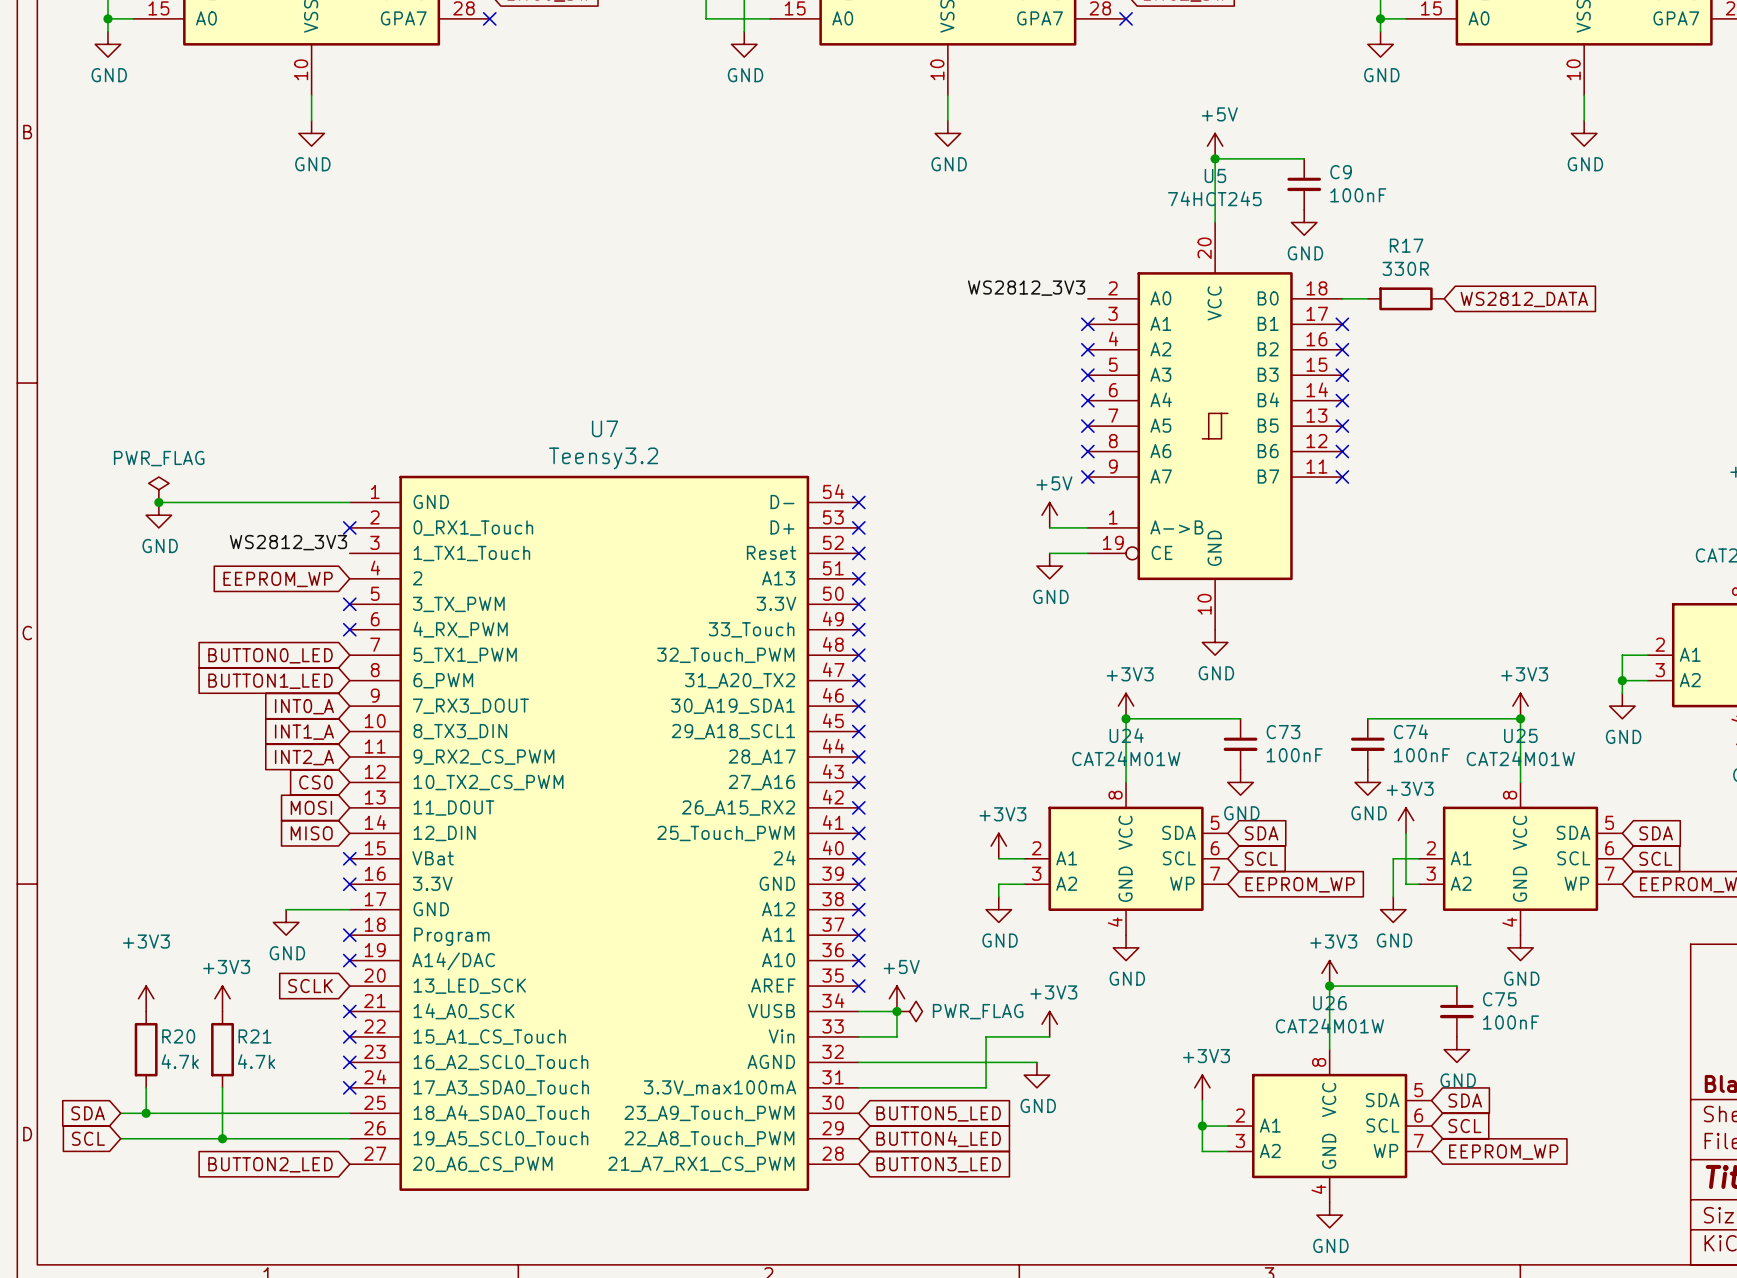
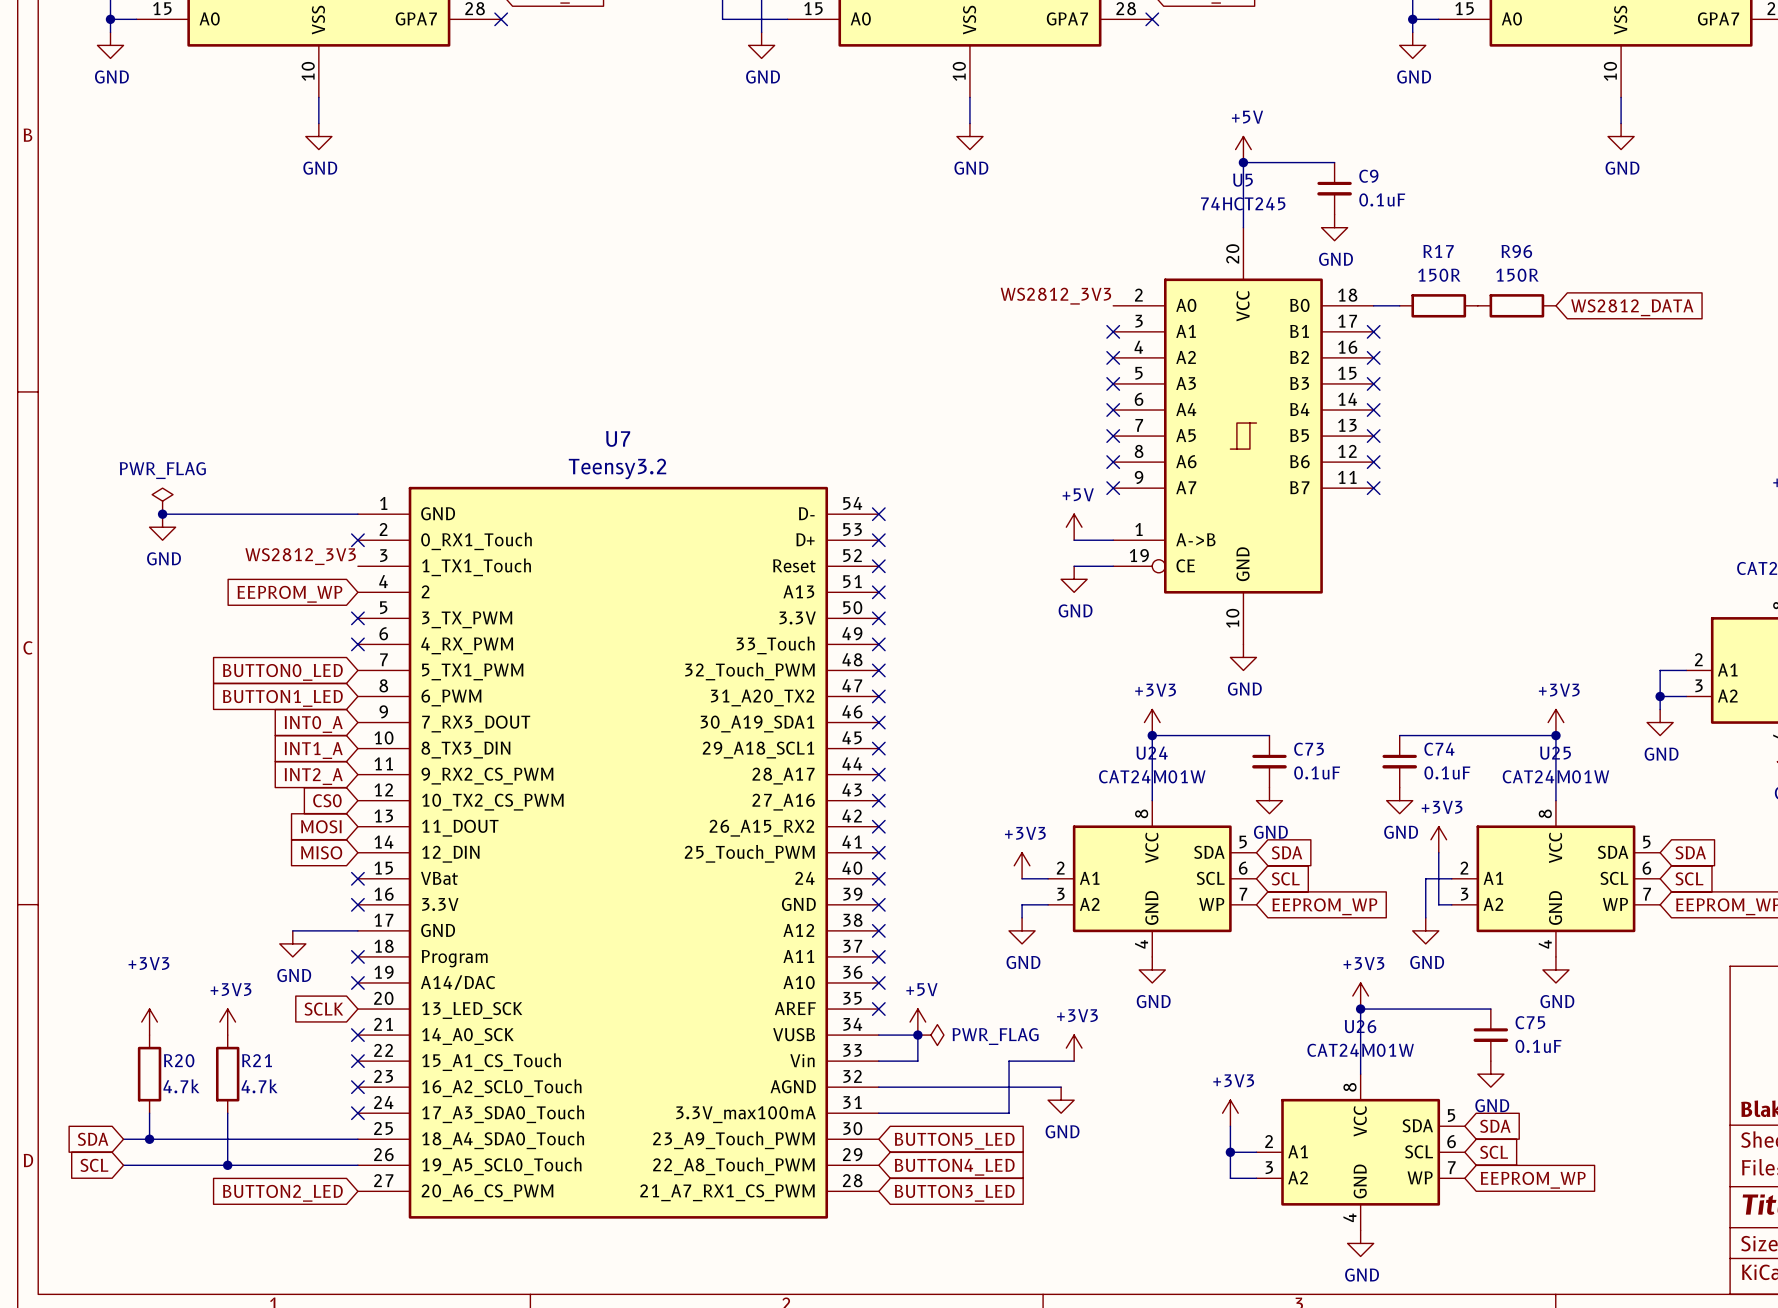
C9 value: 100nF (1358, 195) -> 0.1uF (1382, 199)
R17 value: 330R (1405, 268) -> 150R (1439, 275)
R96: none -> 150R (1516, 305)
global label position: WS2812_DATA (1524, 299) -> WS2812_DATA (1632, 307)
C73 value: 100nF (1294, 755) -> 0.1uF (1317, 772)
C74 value: 100nF (1421, 755) -> 0.1uF (1447, 772)
C75 value: 100nF (1511, 1022) -> 0.1uF (1538, 1046)

